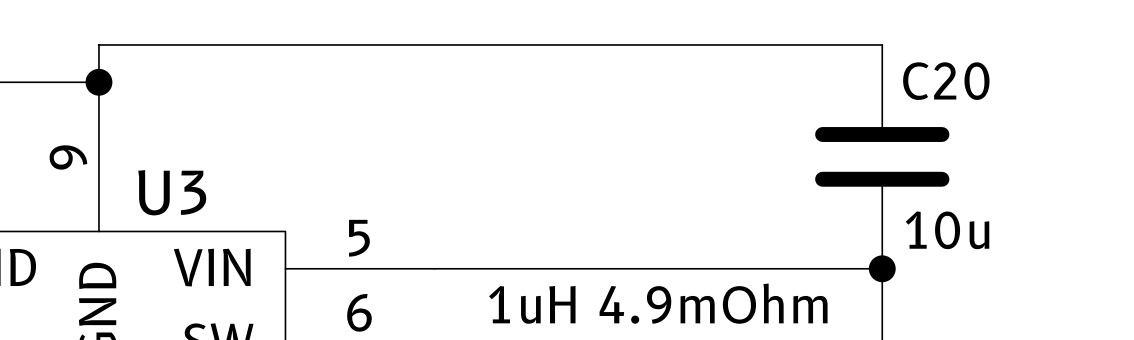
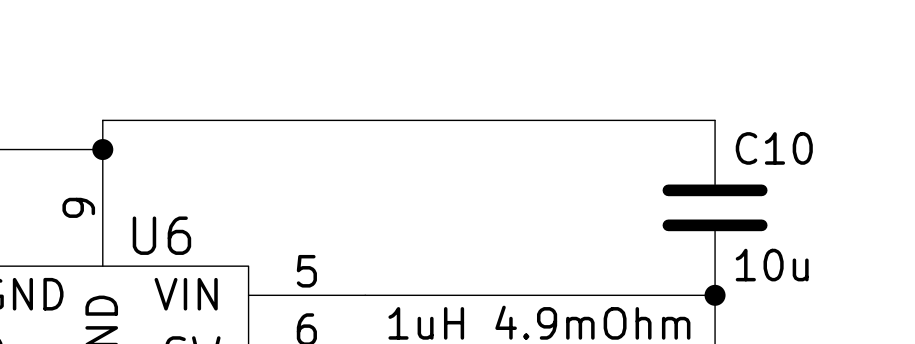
C20 name: C20 (946, 81) -> C10 (774, 148)
U3 name: U3 (172, 192) -> U6 (161, 235)

